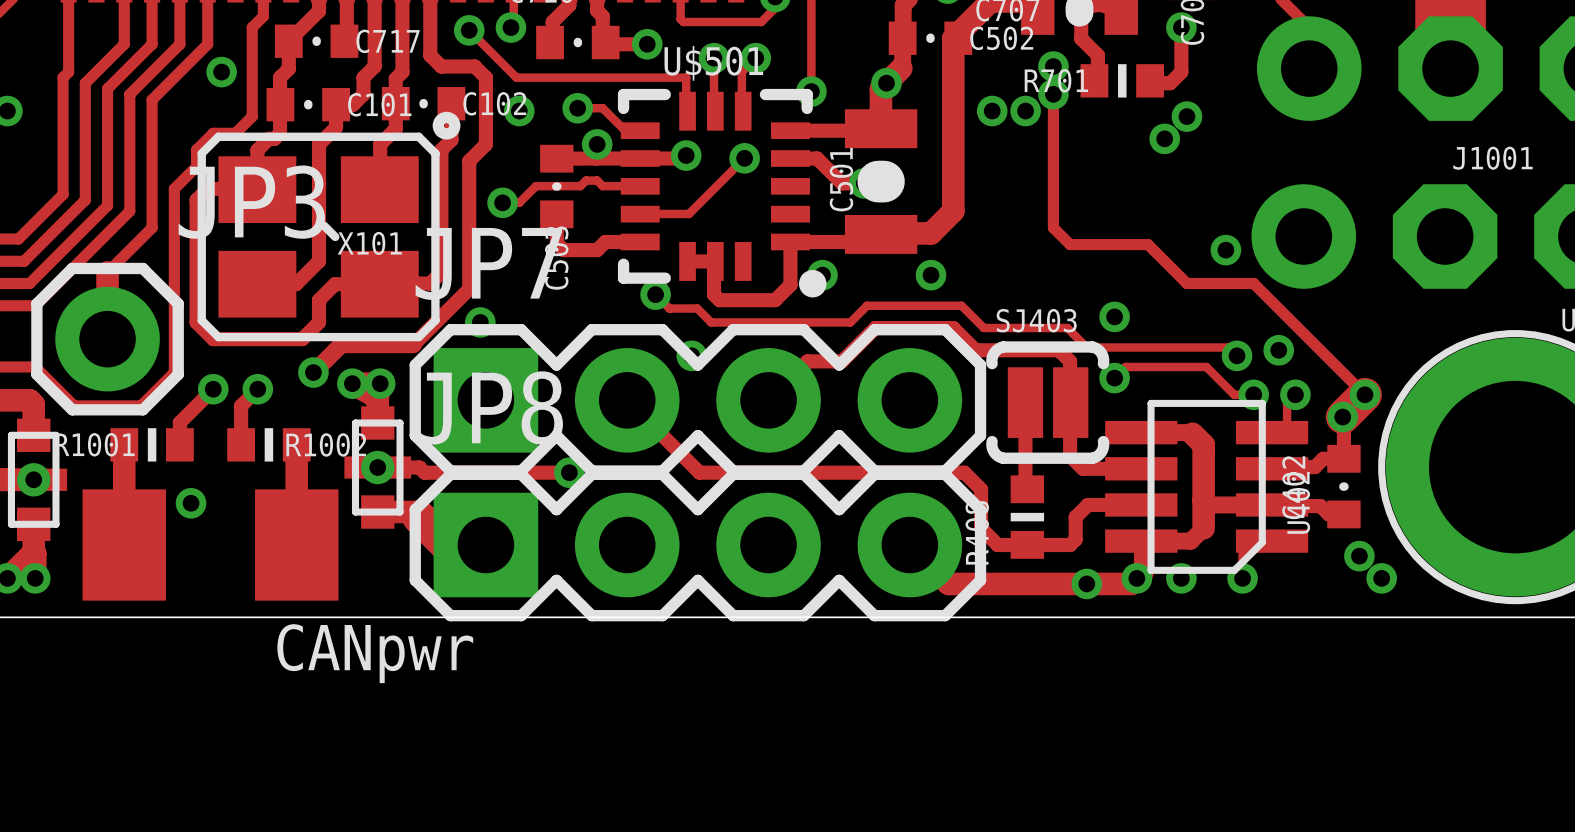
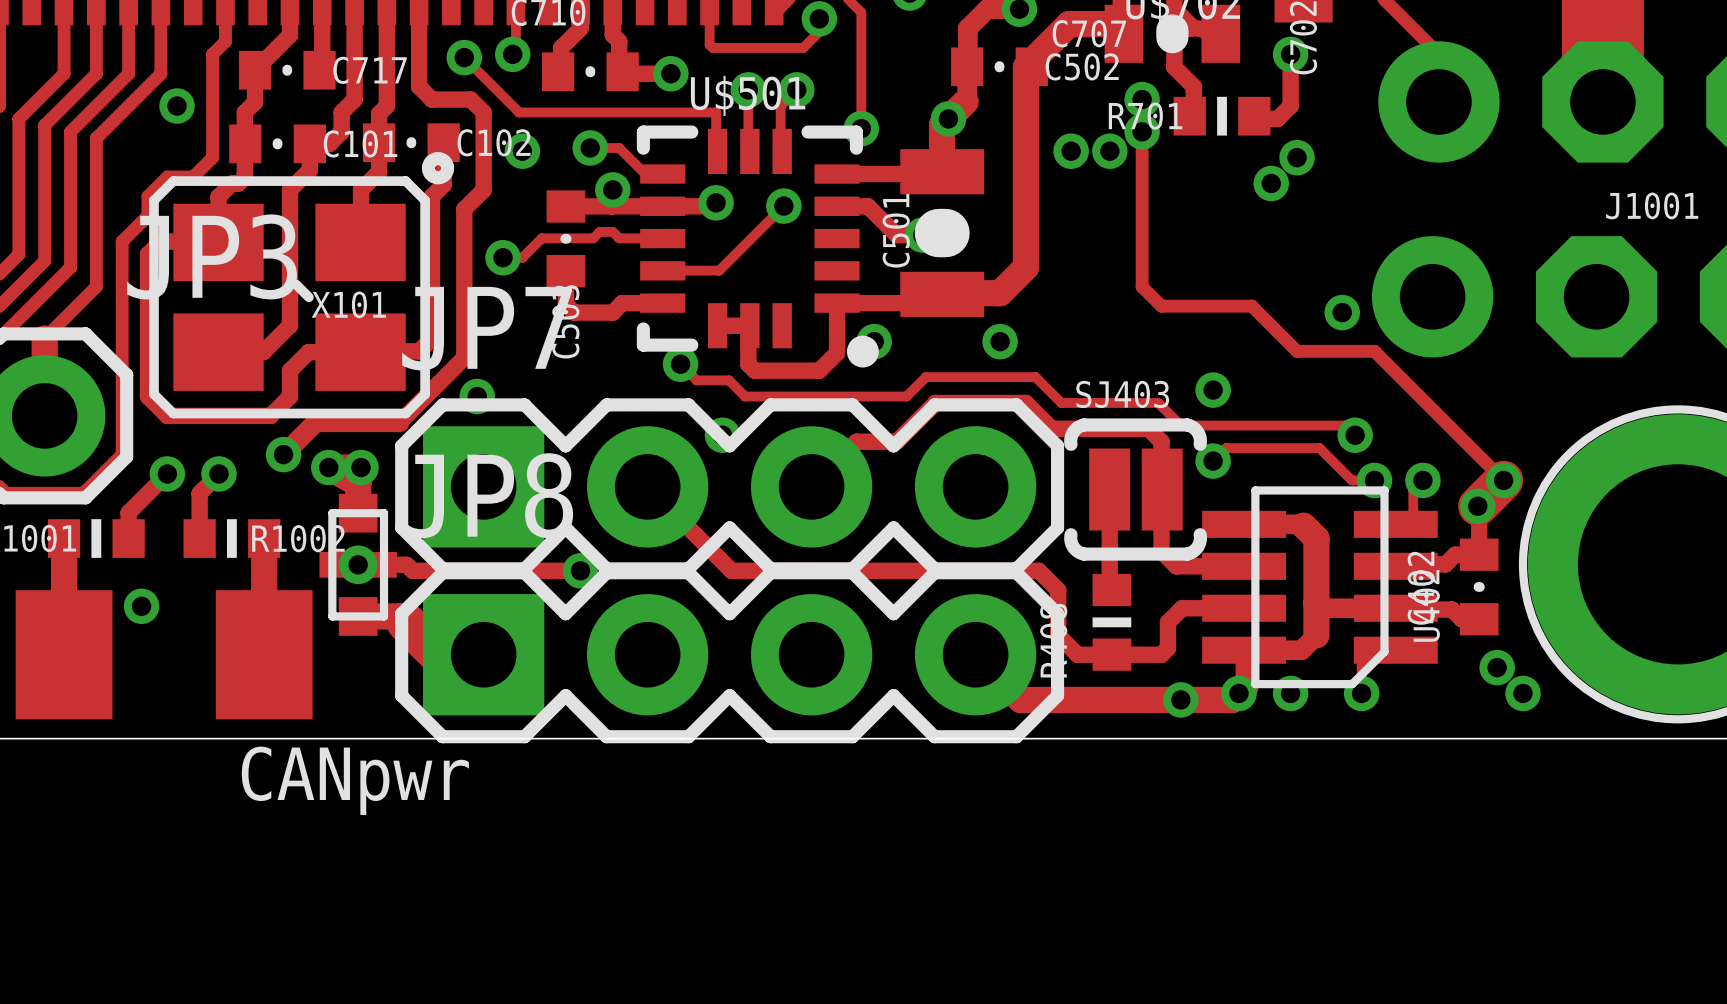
via: (1278, 350) -> none

